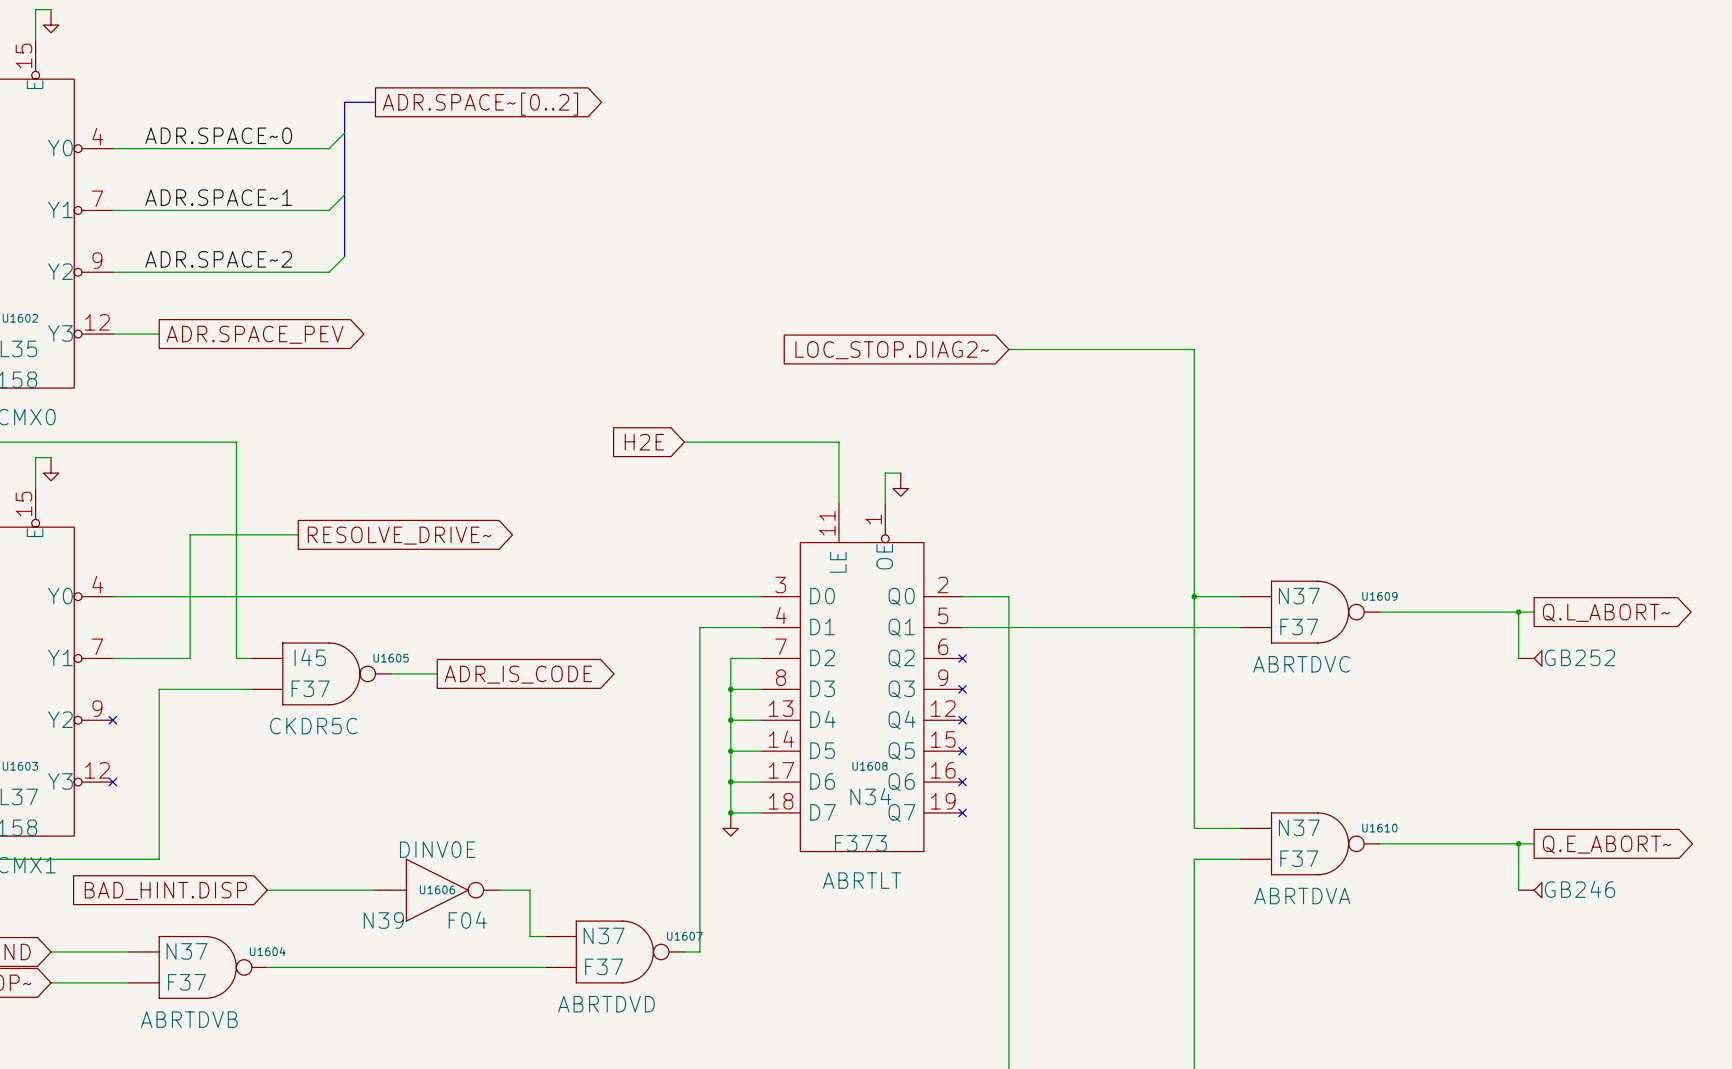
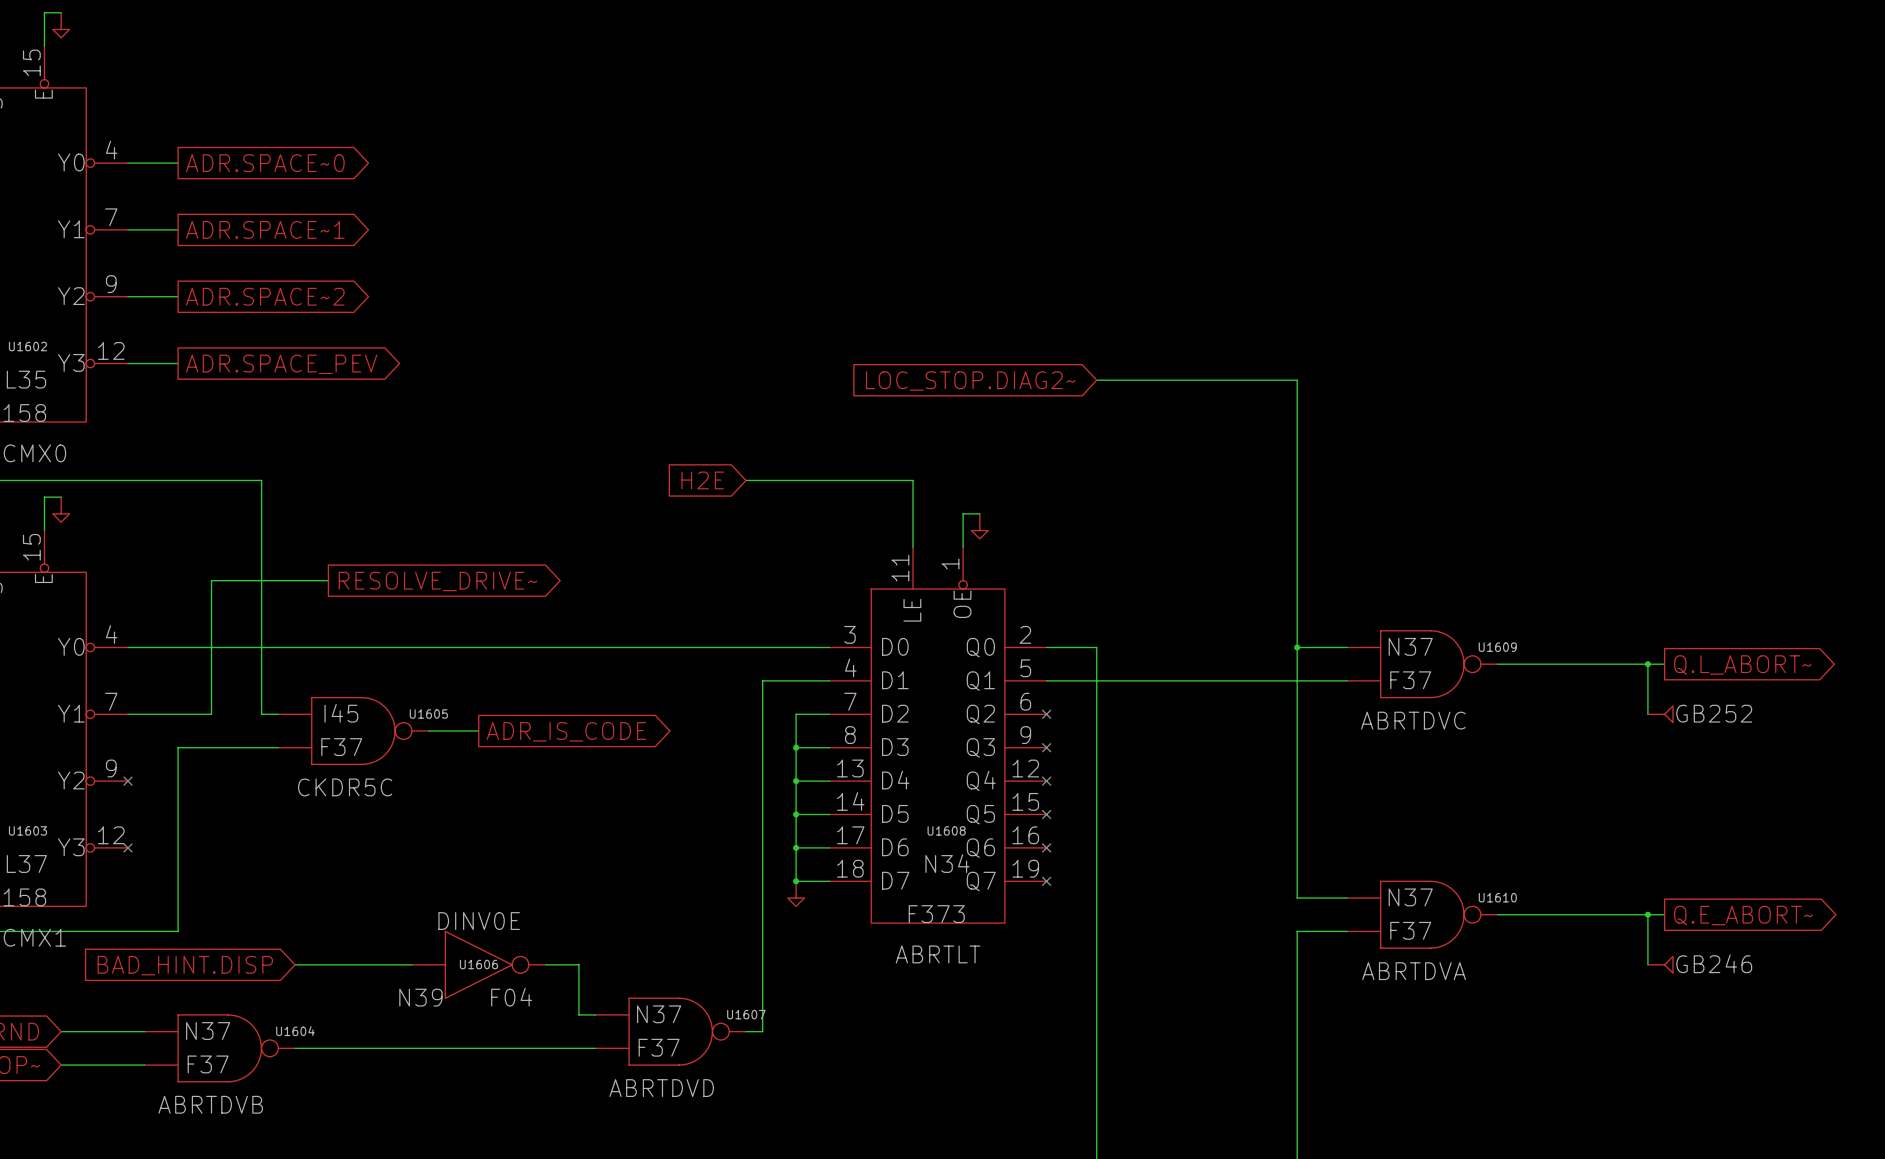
bus: (375, 102) (344, 102) (344, 256) -> none
global label: ADR.SPACE~[0..2] (480, 104) -> none
wire: (344, 133) (329, 148) (159, 148) -> none
label: ADR.SPACE~0 (218, 135) -> none
global label: none -> ADR.SPACE~0 (265, 163)
wire: (344, 195) (329, 210) (159, 210) -> none
label: ADR.SPACE~1 (218, 197) -> none
global label: none -> ADR.SPACE~1 (265, 229)
wire: (344, 256) (329, 272) (159, 272) -> none
label: ADR.SPACE~2 (218, 259) -> none
global label: none -> ADR.SPACE~2 (265, 296)

